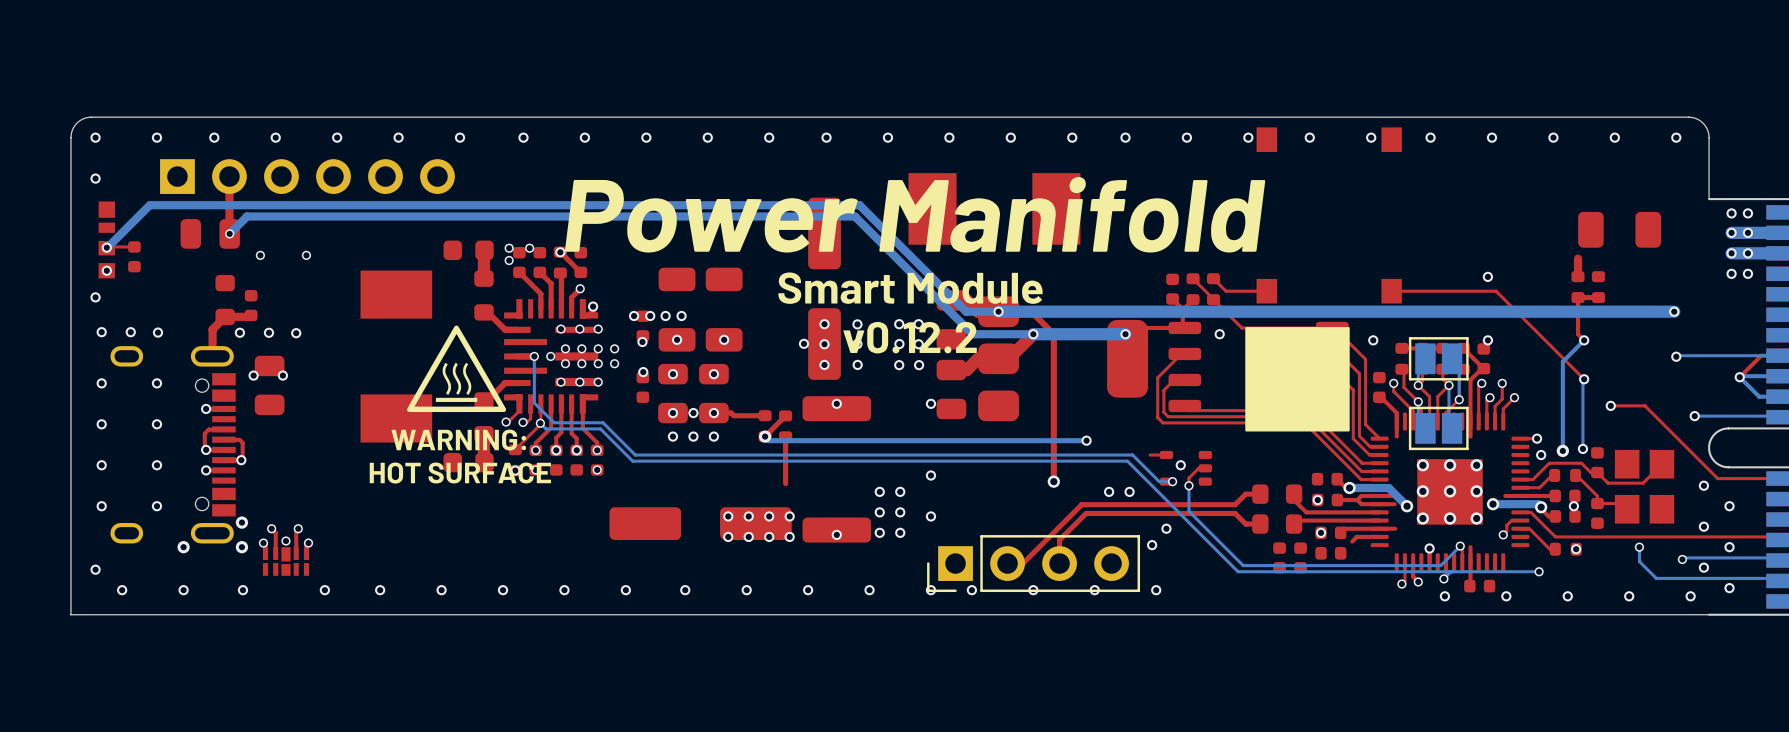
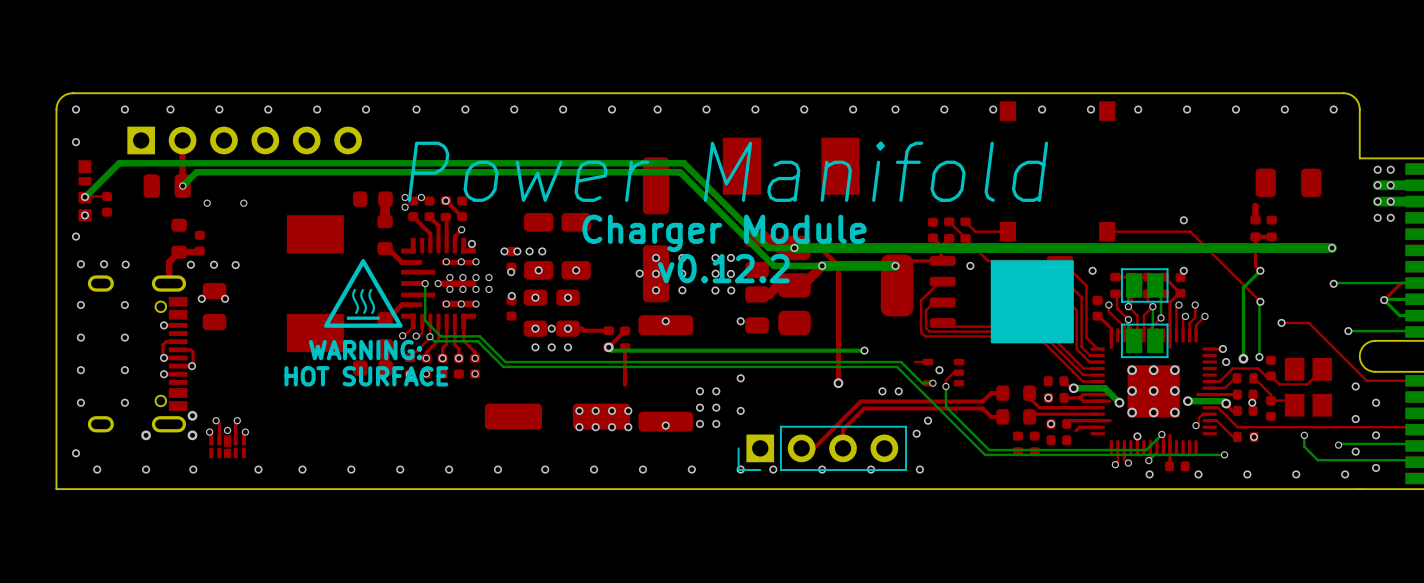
text: Smart Module (910, 288) -> Charger Module (724, 233)

